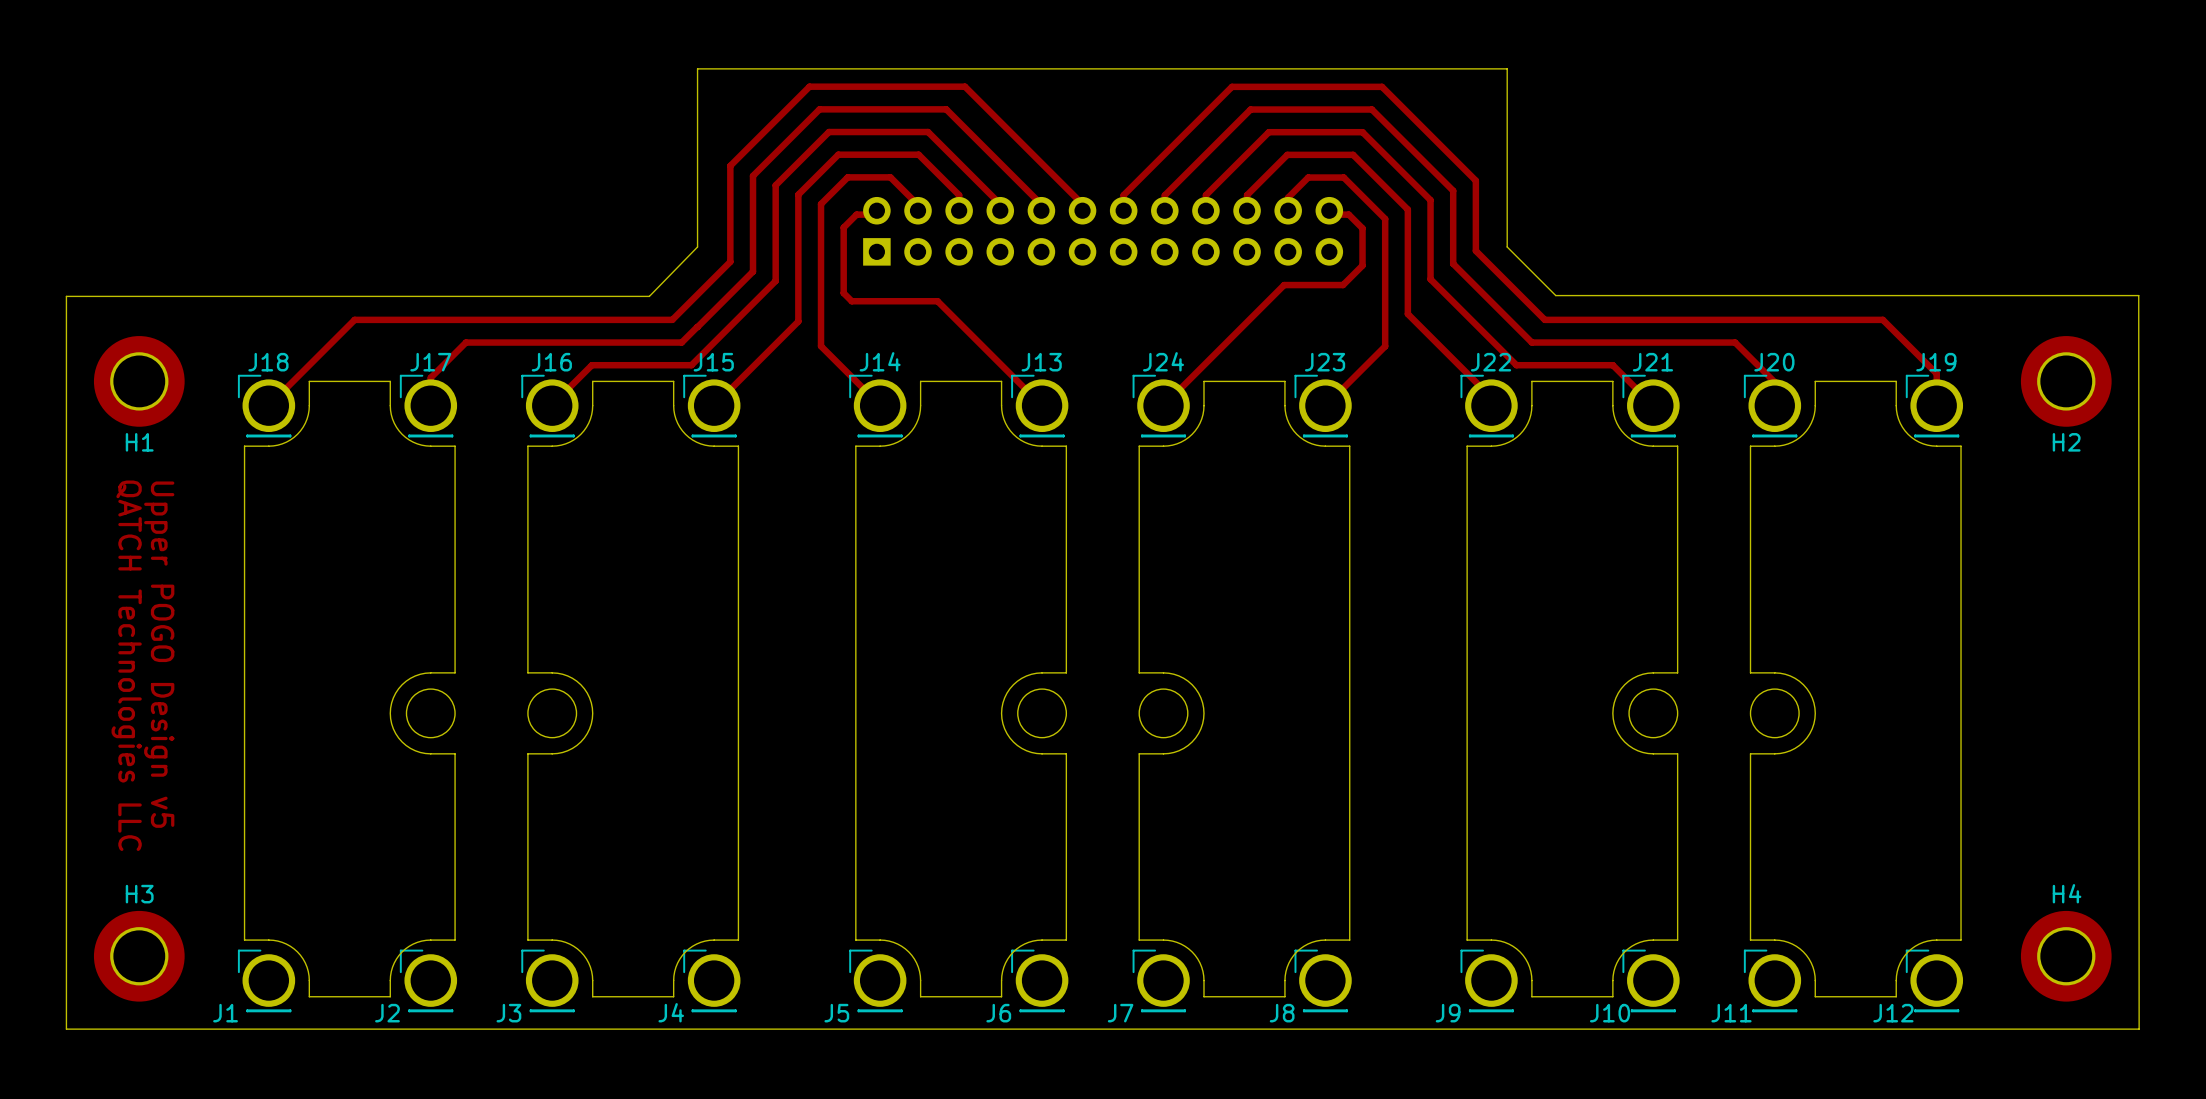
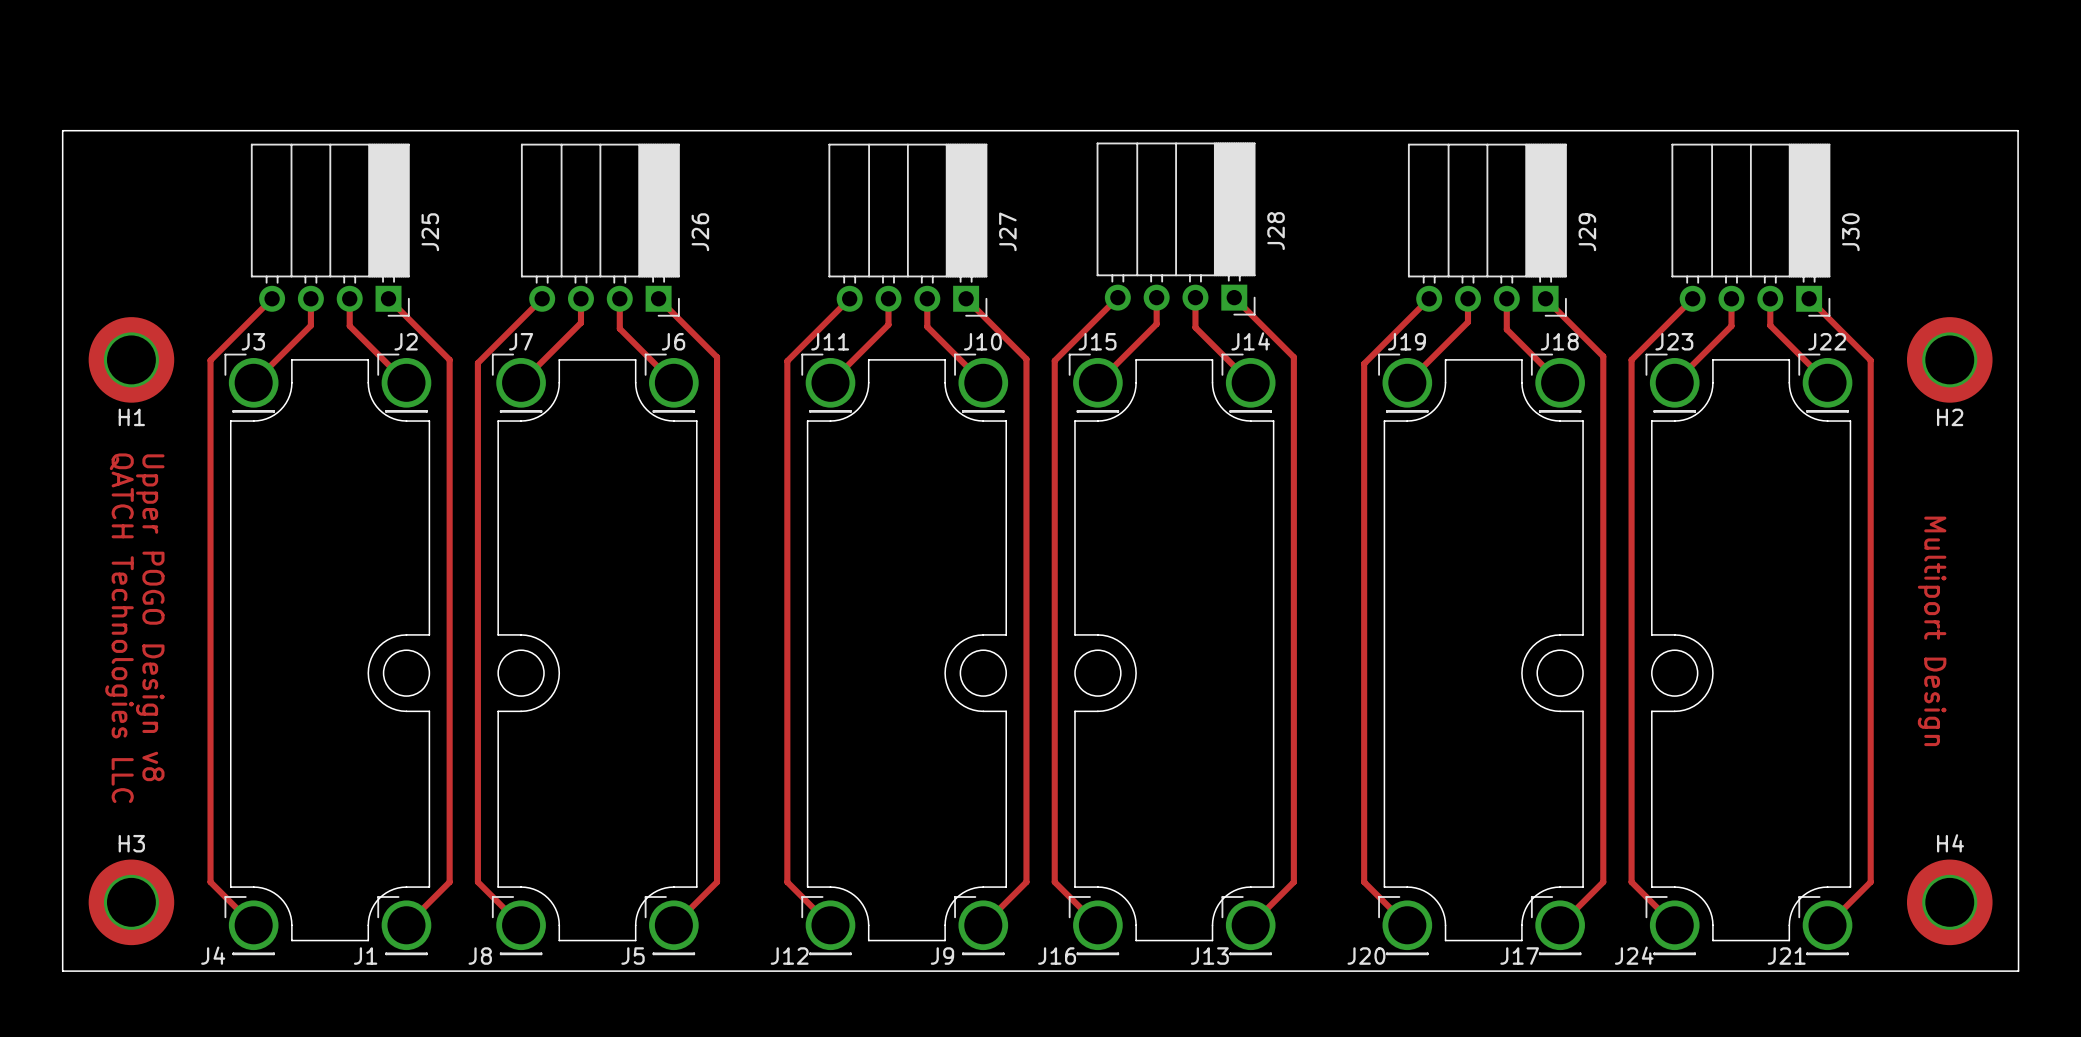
track: (1000, 204) (928, 132) (828, 132) (775, 185) (775, 281) (691, 365) (591, 365) (552, 405) -> (580, 298) (580, 322) (521, 382)
track: (1041, 204) (946, 109) (819, 109) (753, 175) (753, 271) (681, 342) (465, 342) (430, 377) (430, 405) -> (349, 298) (349, 326) (406, 382)
track: (1288, 208) (1288, 197) (1308, 177) (1343, 177) (1385, 218) (1385, 346) (1325, 405) -> (1195, 297) (1195, 327) (1250, 382)
track: (918, 210) (918, 204) (890, 177) (847, 177) (821, 204) (821, 346) (879, 404) -> none
track: (959, 210) (959, 195) (918, 154) (838, 154) (798, 194) (798, 321) (714, 405) -> (619, 298) (619, 328) (673, 382)
track: (1123, 210) (1123, 195) (1231, 86) (1382, 86) (1475, 180) (1475, 250) (1544, 319) (1882, 319) (1936, 373) (1936, 405) -> (1770, 298) (1770, 325) (1827, 382)
track: (1164, 210) (1164, 195) (1250, 109) (1371, 109) (1453, 190) (1453, 263) (1531, 342) (1735, 342) (1774, 382) (1774, 405) -> (1731, 298) (1731, 326) (1674, 382)
track: (1205, 210) (1205, 195) (1268, 132) (1362, 132) (1430, 200) (1430, 279) (1516, 365) (1612, 365) -> (1506, 298) (1506, 329) (1521, 344)
track: (1247, 210) (1247, 195) (1287, 154) (1353, 154) (1407, 209) (1407, 314) (1491, 397) (1491, 405) -> (1467, 298) (1467, 322) (1407, 382)
track: (876, 214) (856, 214) (843, 227) (843, 293) (851, 301) (937, 301) (982, 346) -> (927, 298) (927, 326)
track: (1082, 214) (1082, 204) (965, 86) (809, 86) (730, 165) (730, 261) (672, 319) (354, 319) (329, 345) -> (310, 298) (310, 325)
track: (1329, 214) (1348, 214) (1362, 228) (1362, 265) (1343, 285) (1284, 285) (1225, 343) -> (1156, 297) (1156, 324)
part: (1103, 231) -> none
J28: none -> (1176, 229)
J25: none -> (330, 230)
J26: none -> (600, 230)
J27: none -> (907, 230)
J29: none -> (1487, 230)
J30: none -> (1750, 230)
board edge: (2138, 295) (1555, 295) (1507, 247) (1507, 68) (697, 68) (697, 247) (649, 296) (66, 296) -> (2018, 278) (2018, 130) (62, 130) (62, 279)
track: none -> (1117, 297) (1054, 360) (1054, 882) (1097, 925)
track: none -> (1234, 297) (1293, 357) (1293, 882) (1250, 925)
track: none -> (272, 298) (210, 360) (210, 882) (253, 925)
track: none -> (388, 298) (449, 359) (449, 882) (406, 925)
track: none -> (542, 298) (477, 363) (477, 882) (521, 925)
track: none -> (658, 298) (717, 357) (717, 882) (673, 925)
track: none -> (849, 298) (787, 361) (787, 882) (830, 925)
track: none -> (888, 298) (888, 324) (830, 382)
track: none -> (966, 298) (1026, 359) (1026, 882) (983, 925)
track: none -> (1429, 298) (1364, 363) (1364, 882) (1407, 925)
track: none -> (1545, 298) (1603, 356) (1603, 882) (1560, 925)
track: none -> (1692, 298) (1631, 359) (1631, 882) (1674, 925)
track: none -> (1809, 298) (1870, 360) (1870, 882) (1827, 925)
J14 name: J14 (880, 361) -> J11 (830, 341)
J24 name: J24 (1163, 361) -> J15 (1097, 341)
J18 name: J18 (268, 362) -> J3 (253, 341)
J17 name: J17 (430, 362) -> J2 (406, 341)
J16 name: J16 (551, 362) -> J7 (521, 341)
J15 name: J15 (713, 362) -> J6 (673, 341)
J13 name: J13 (1041, 362) -> J10 (982, 341)
J23 name: J23 (1325, 362) -> J14 (1250, 341)
J22 name: J22 (1491, 362) -> J19 (1406, 341)
J21 name: J21 (1652, 362) -> J18 (1559, 341)
J20 name: J20 (1774, 362) -> J23 (1674, 341)
J19 name: J19 (1936, 362) -> J22 (1827, 341)
text: Upper POGO Design v5 (159, 654) -> Upper POGO Design v8 (150, 617)
text: none -> Multiport Design (1932, 631)
J4 name: J4 (671, 1012) -> J5 (633, 956)
J1 name: J1 (225, 1013) -> J4 (213, 955)
J2 name: J2 (387, 1013) -> J1 (365, 956)
J3 name: J3 (508, 1013) -> J8 (480, 956)
J5 name: J5 (836, 1013) -> J12 (789, 956)
J6 name: J6 (998, 1013) -> J9 (942, 956)
J7 name: J7 (1120, 1013) -> J16 (1057, 956)
J8 name: J8 (1282, 1013) -> J13 (1209, 956)
J9 name: J9 (1448, 1013) -> J20 (1366, 956)
J10 name: J10 (1610, 1013) -> J17 (1519, 956)
J11 name: J11 (1731, 1013) -> J24 (1634, 955)
J12 name: J12 (1893, 1013) -> J21 (1786, 956)

